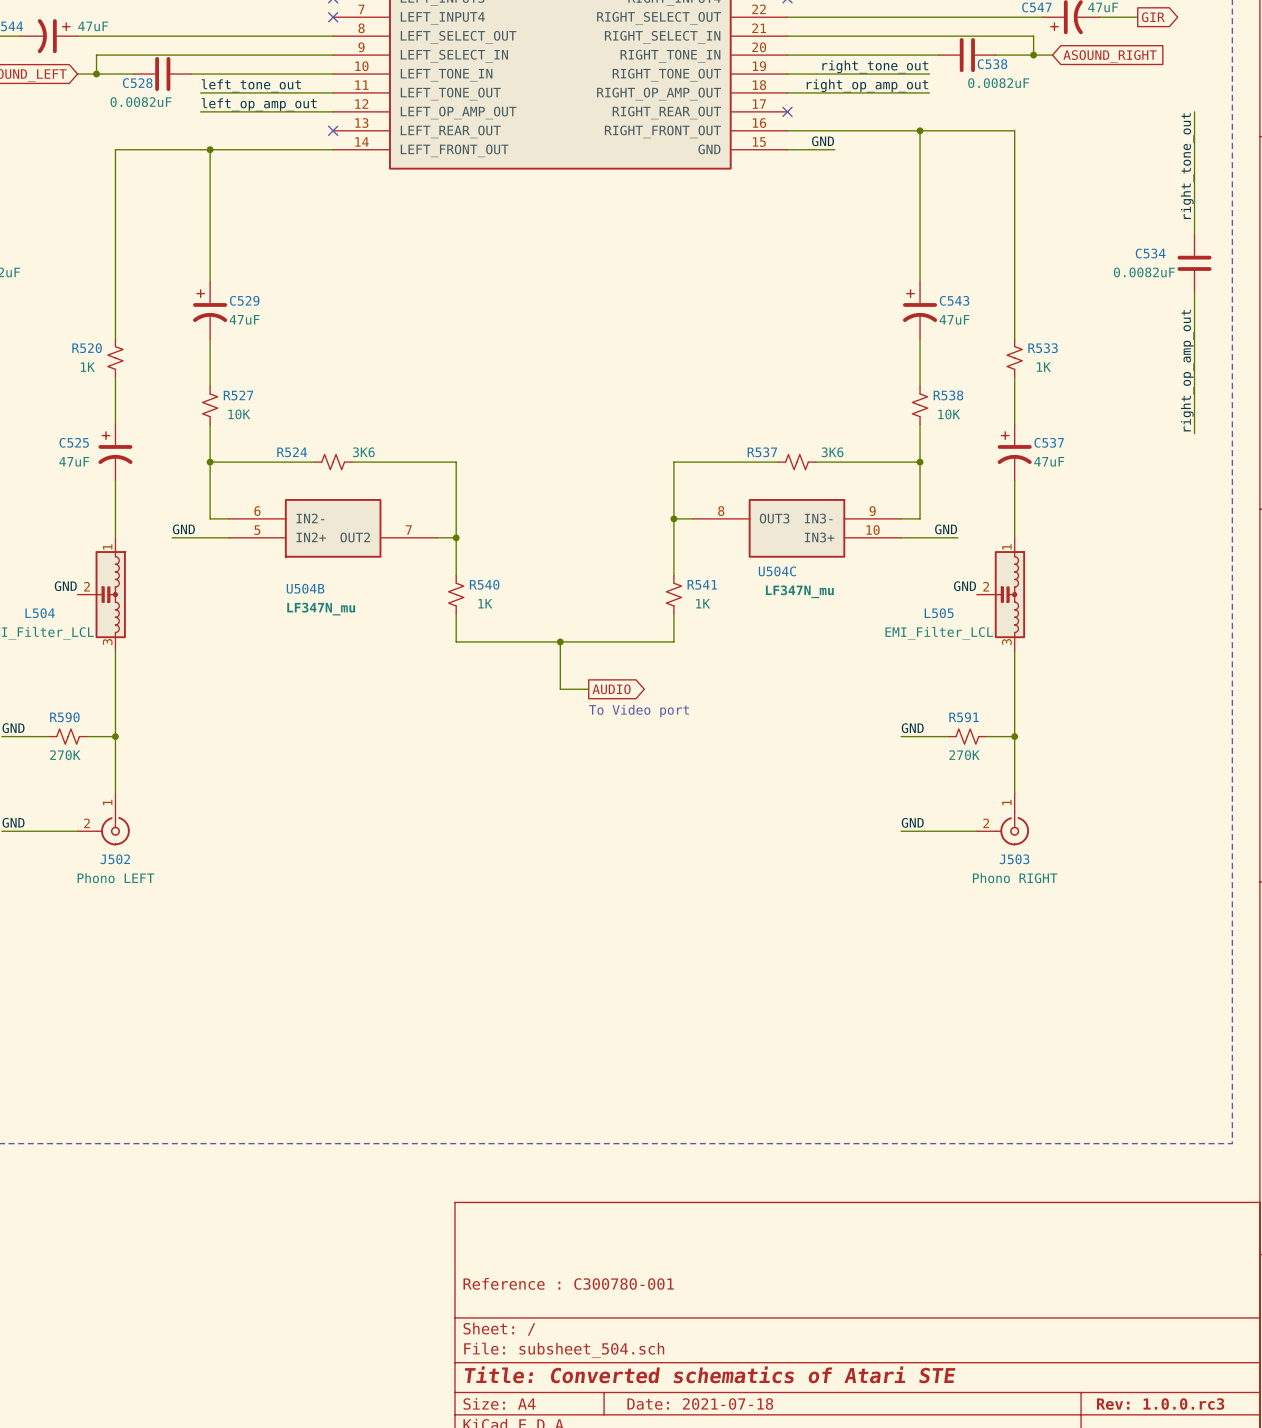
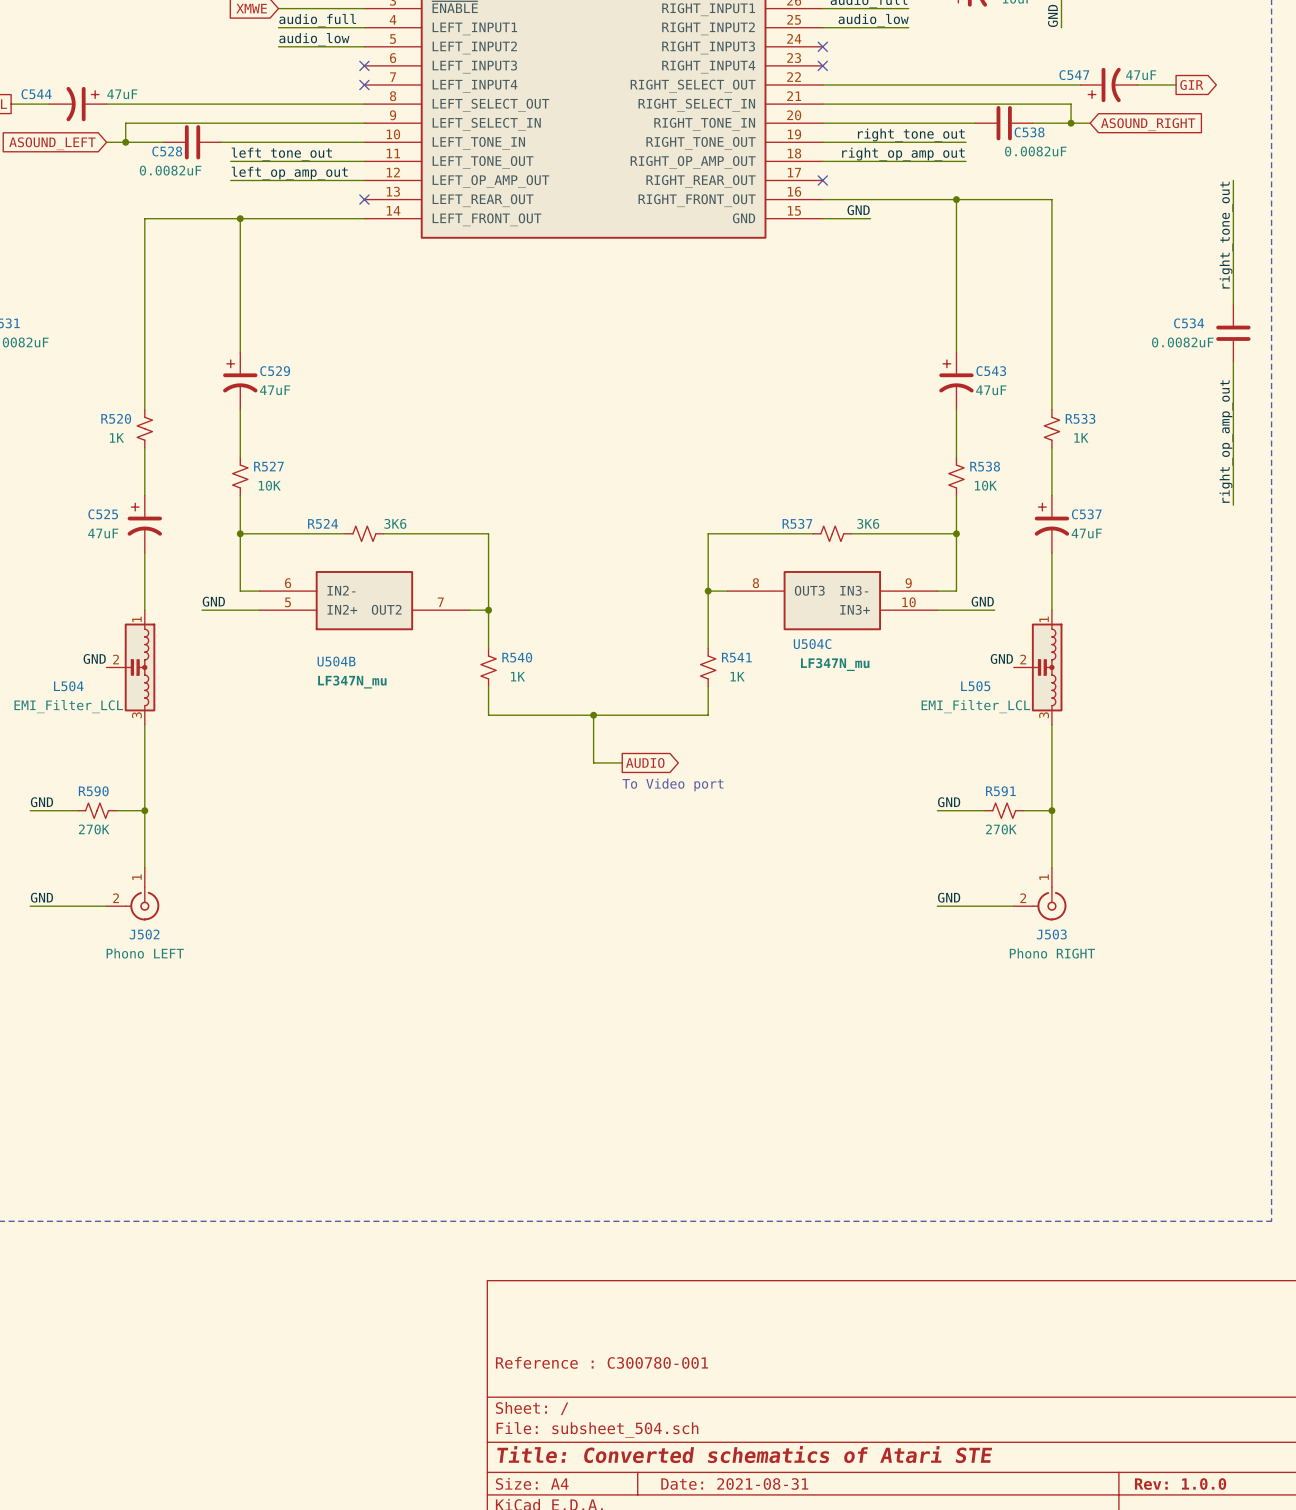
title block: Date: 2021-07-18 (700, 1404) -> Date: 2021-08-31 (734, 1484)
title block: Rev: 1.0.0.rc3 (1160, 1404) -> Rev: 1.0.0 (1180, 1484)

